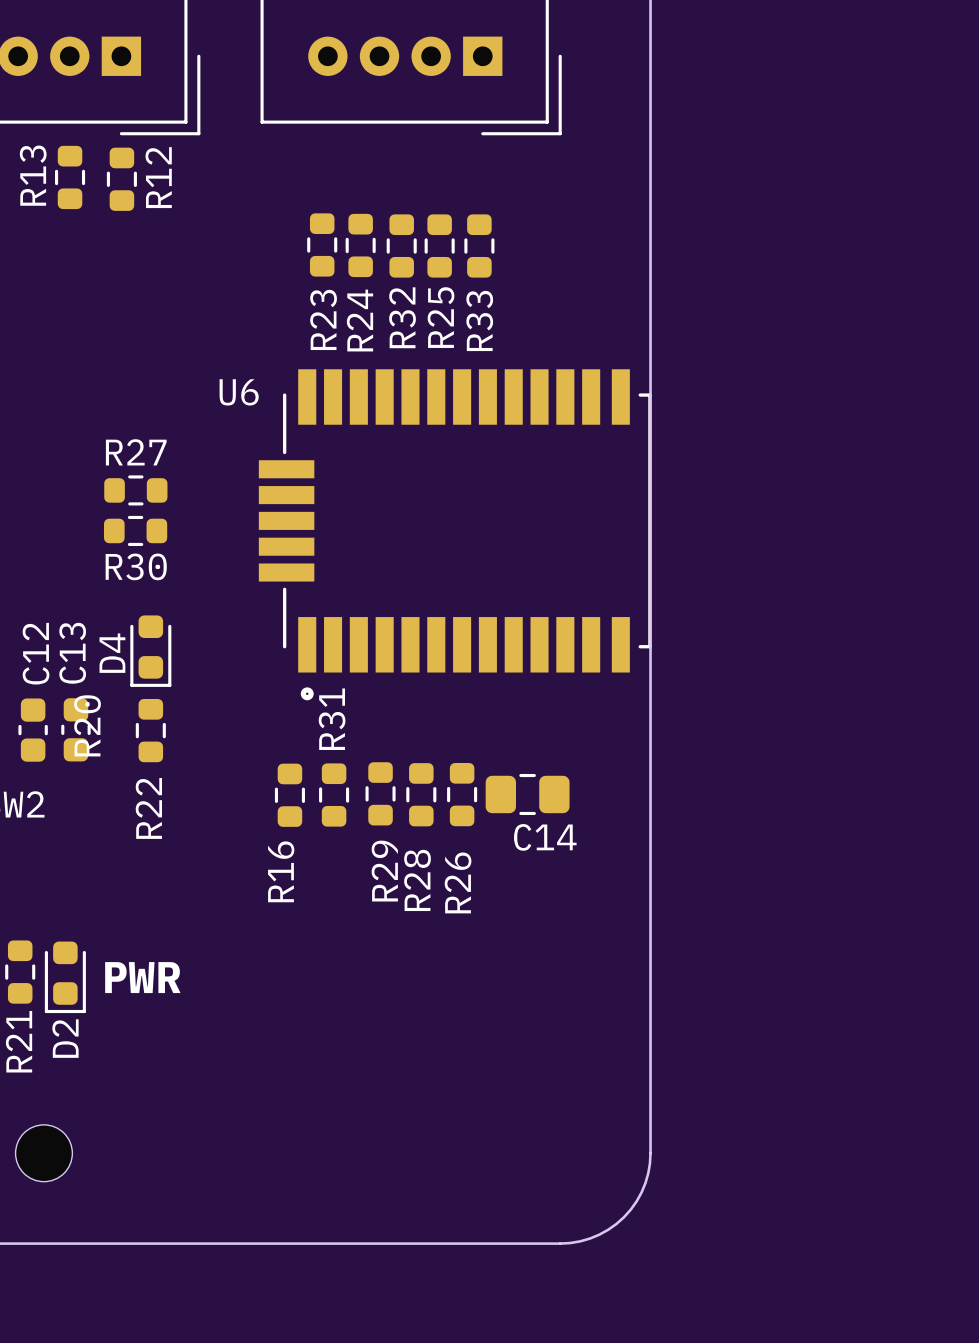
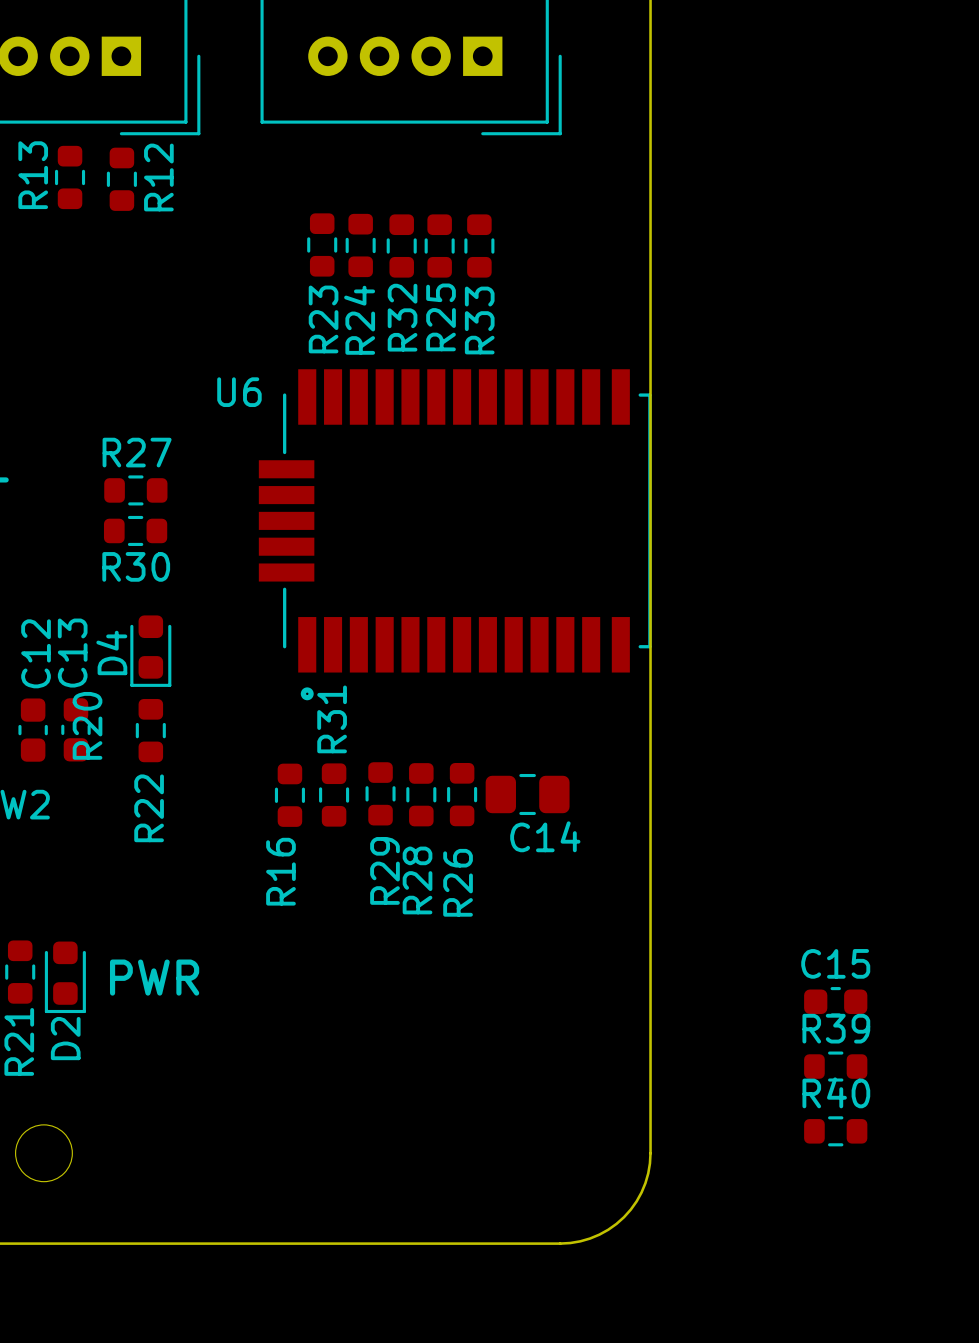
C15: none -> (835, 1001)
R39: none -> (835, 1066)
R40: none -> (835, 1131)

